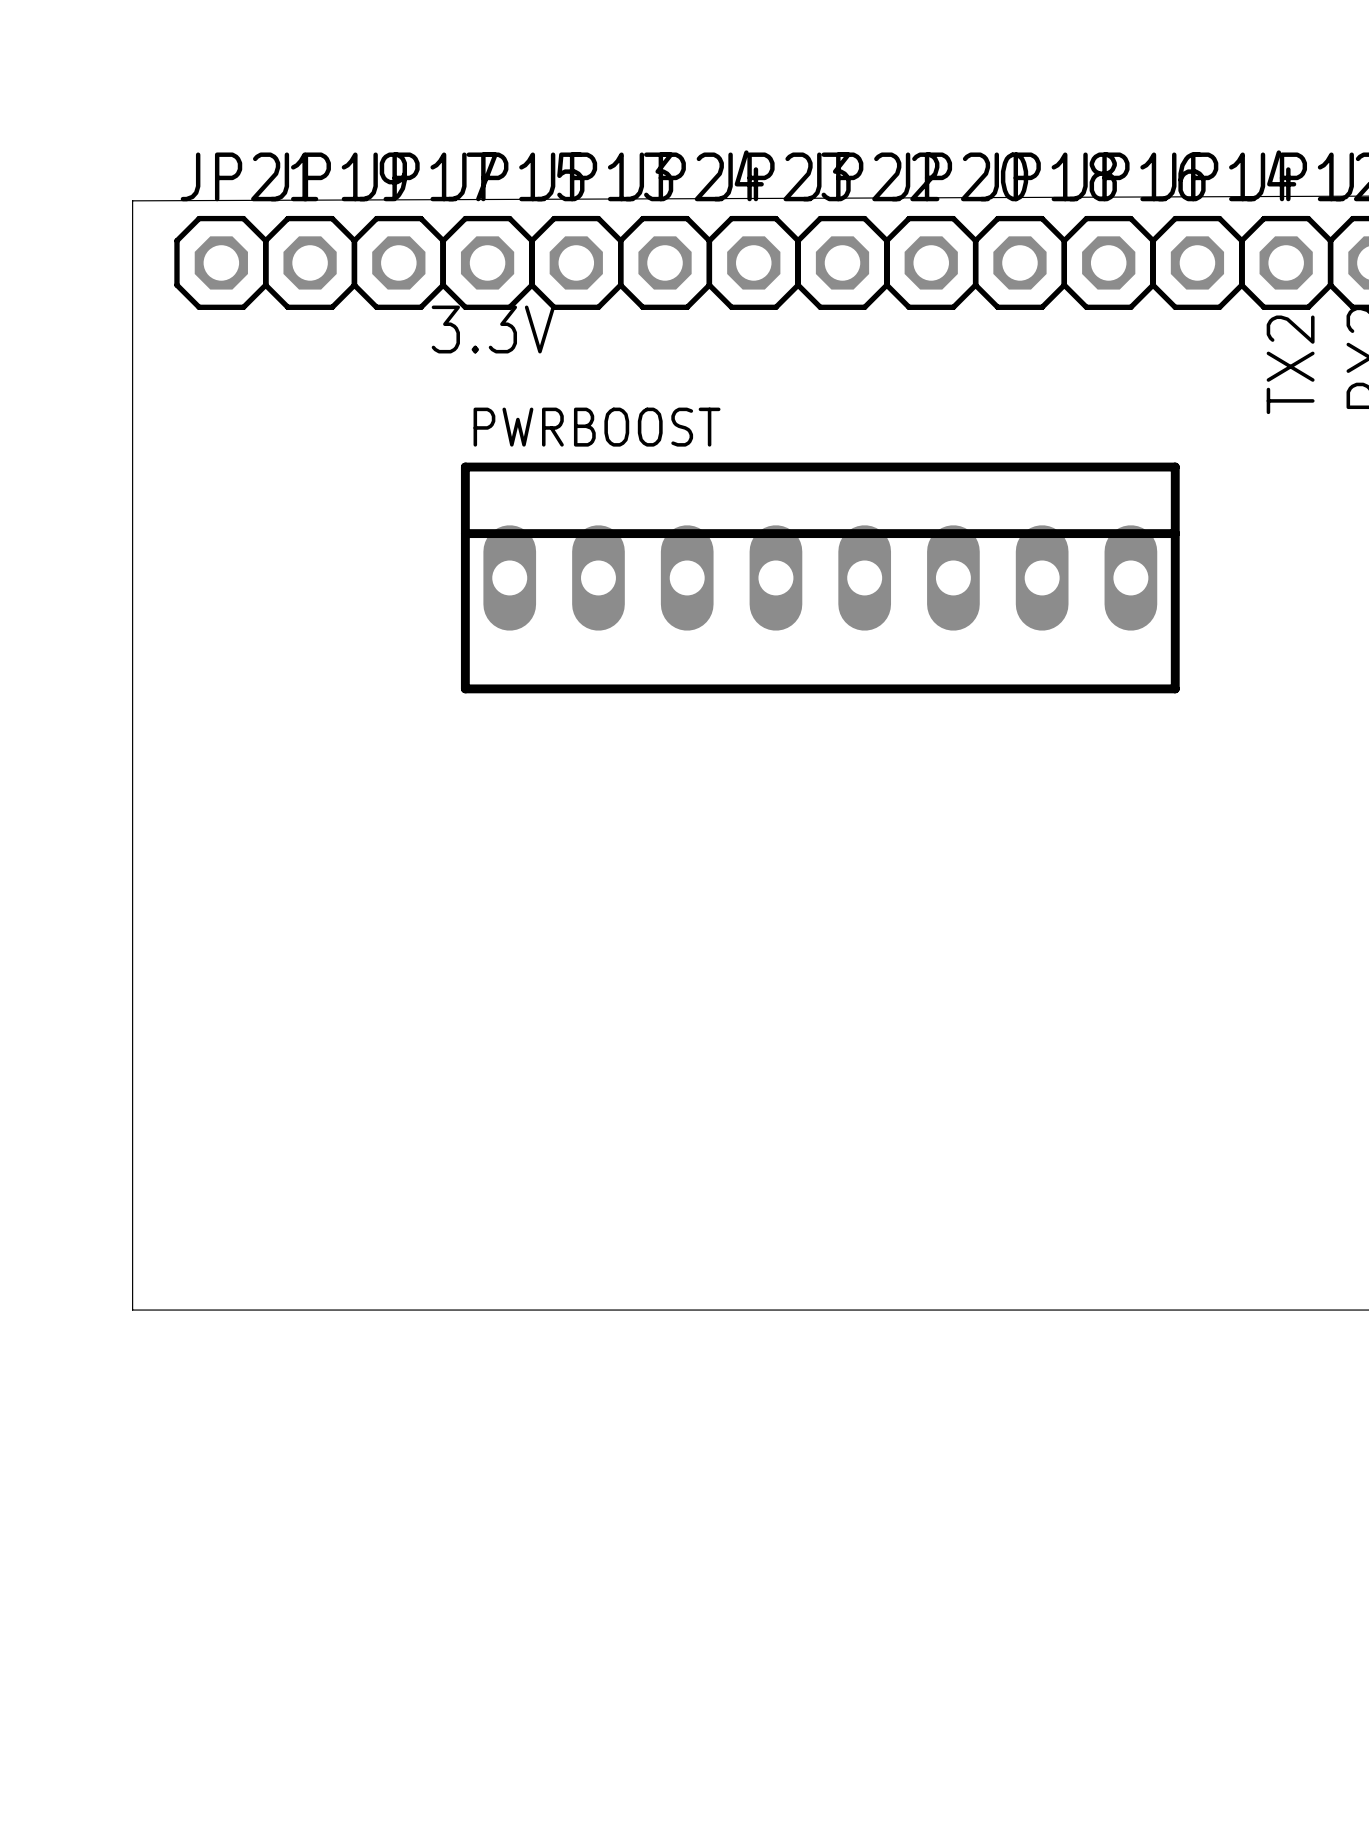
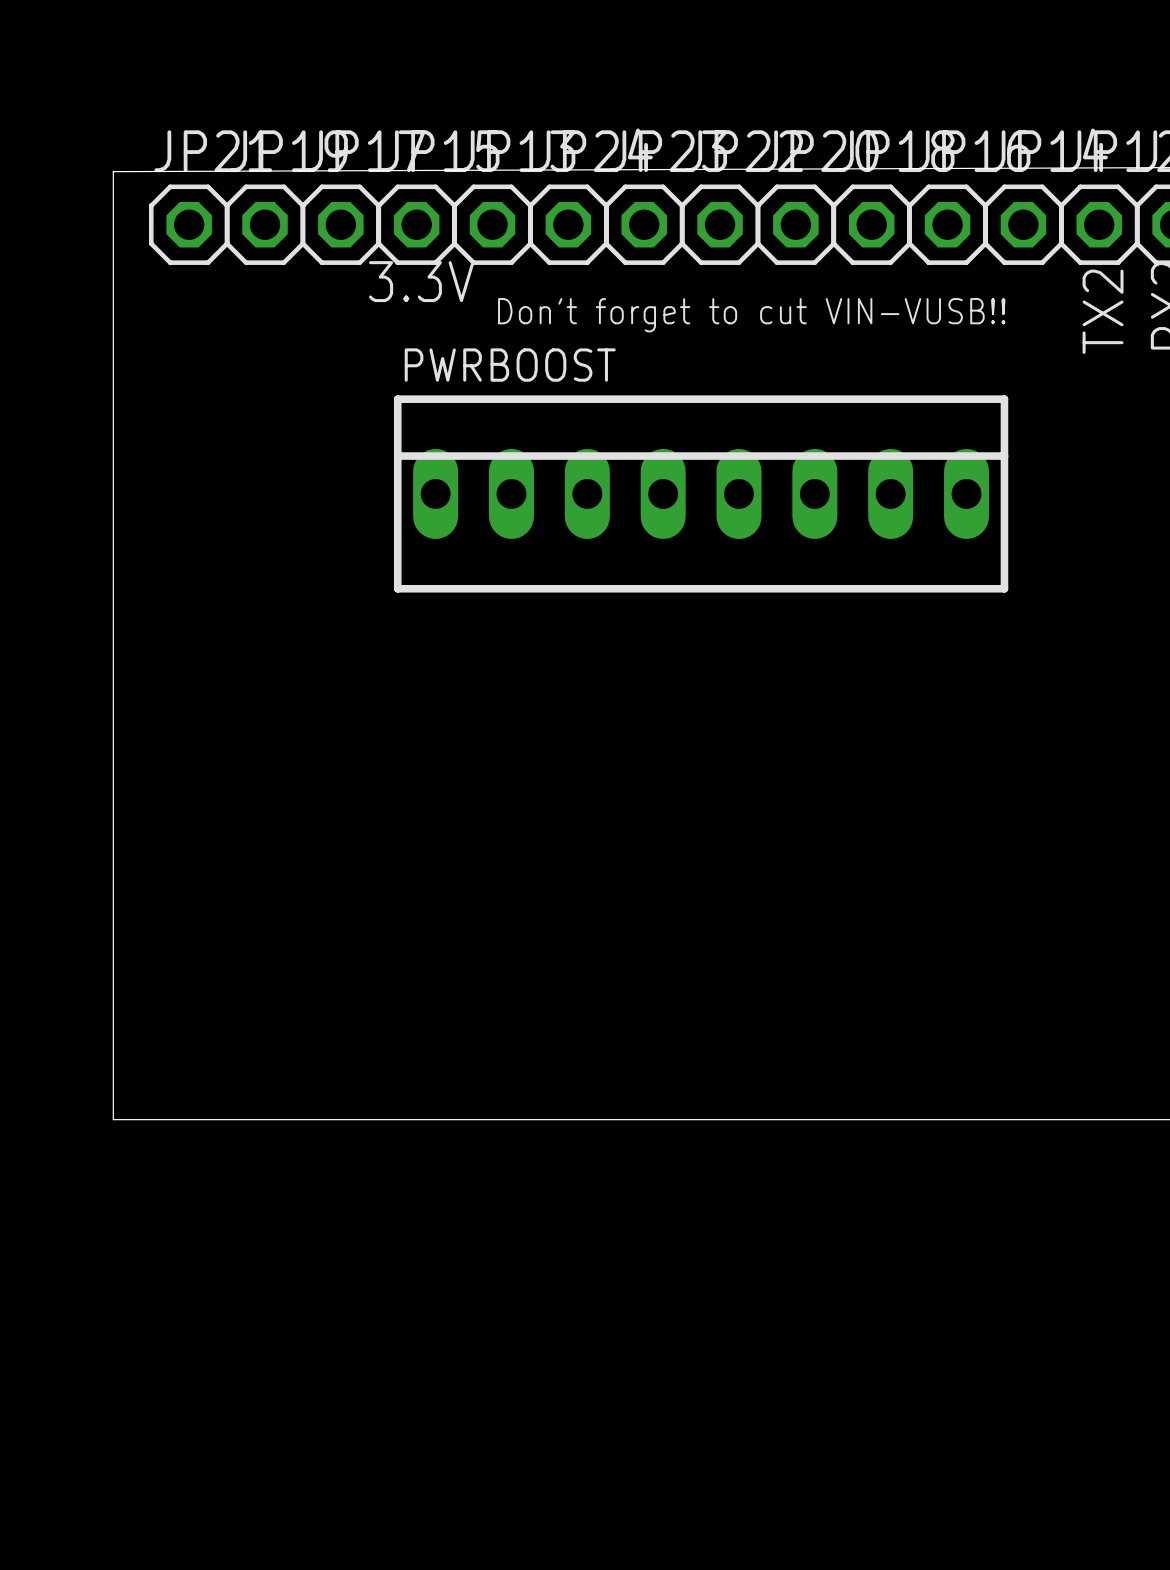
text: none -> Don't forget to cut VIN-VUSB!! (751, 315)

